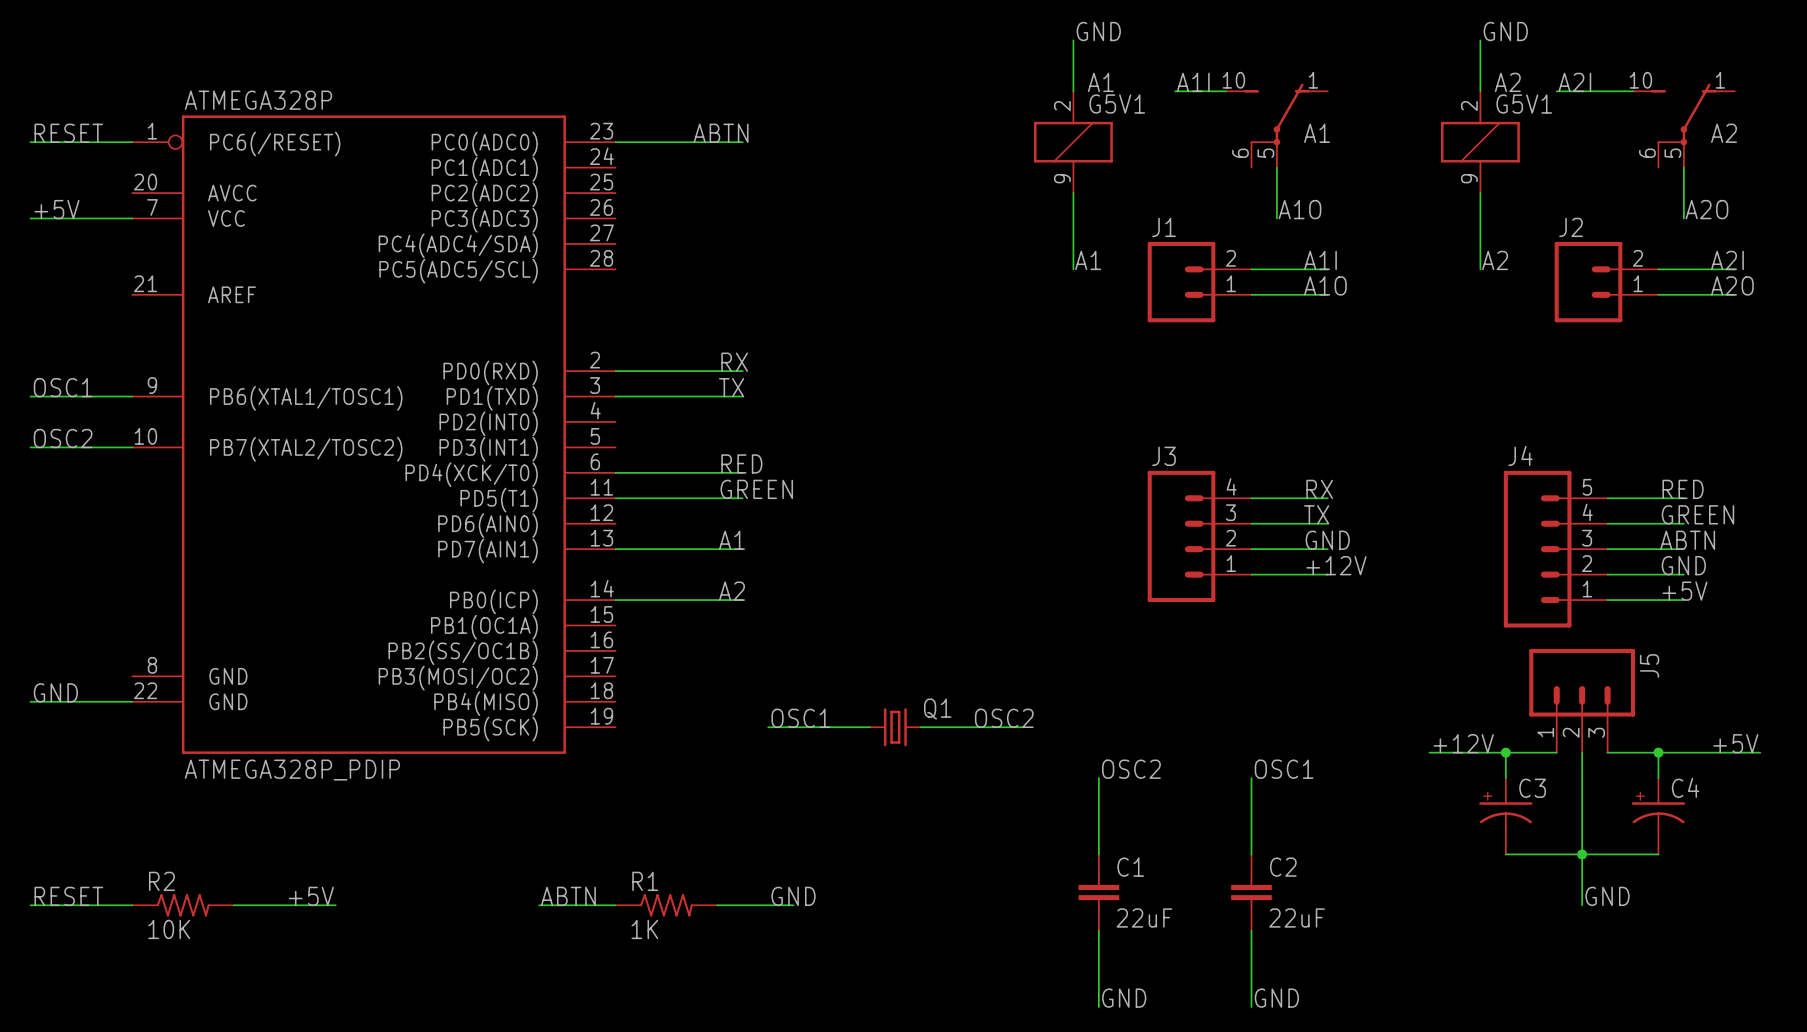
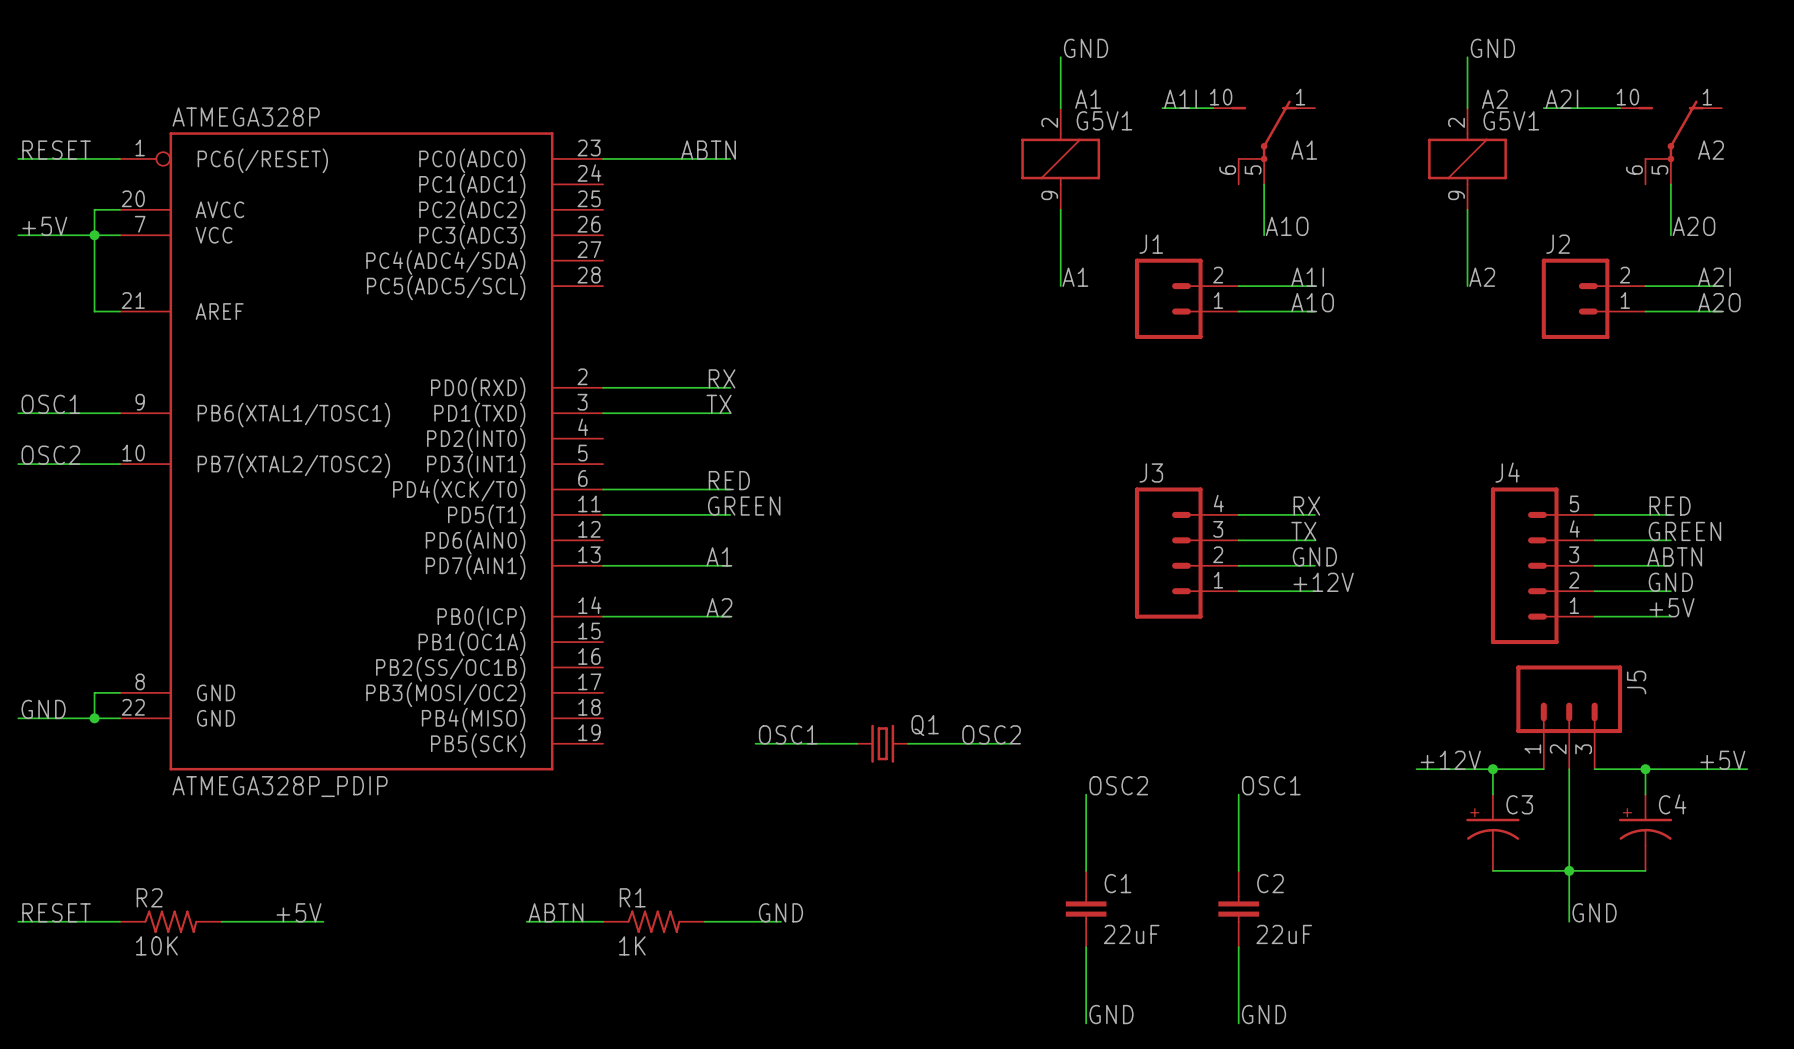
wire: none -> (119, 209) (94, 209) (94, 311) (119, 311)
junction: none -> (94, 235)
wire: none -> (119, 692) (94, 692) (94, 718)
junction: none -> (94, 718)

